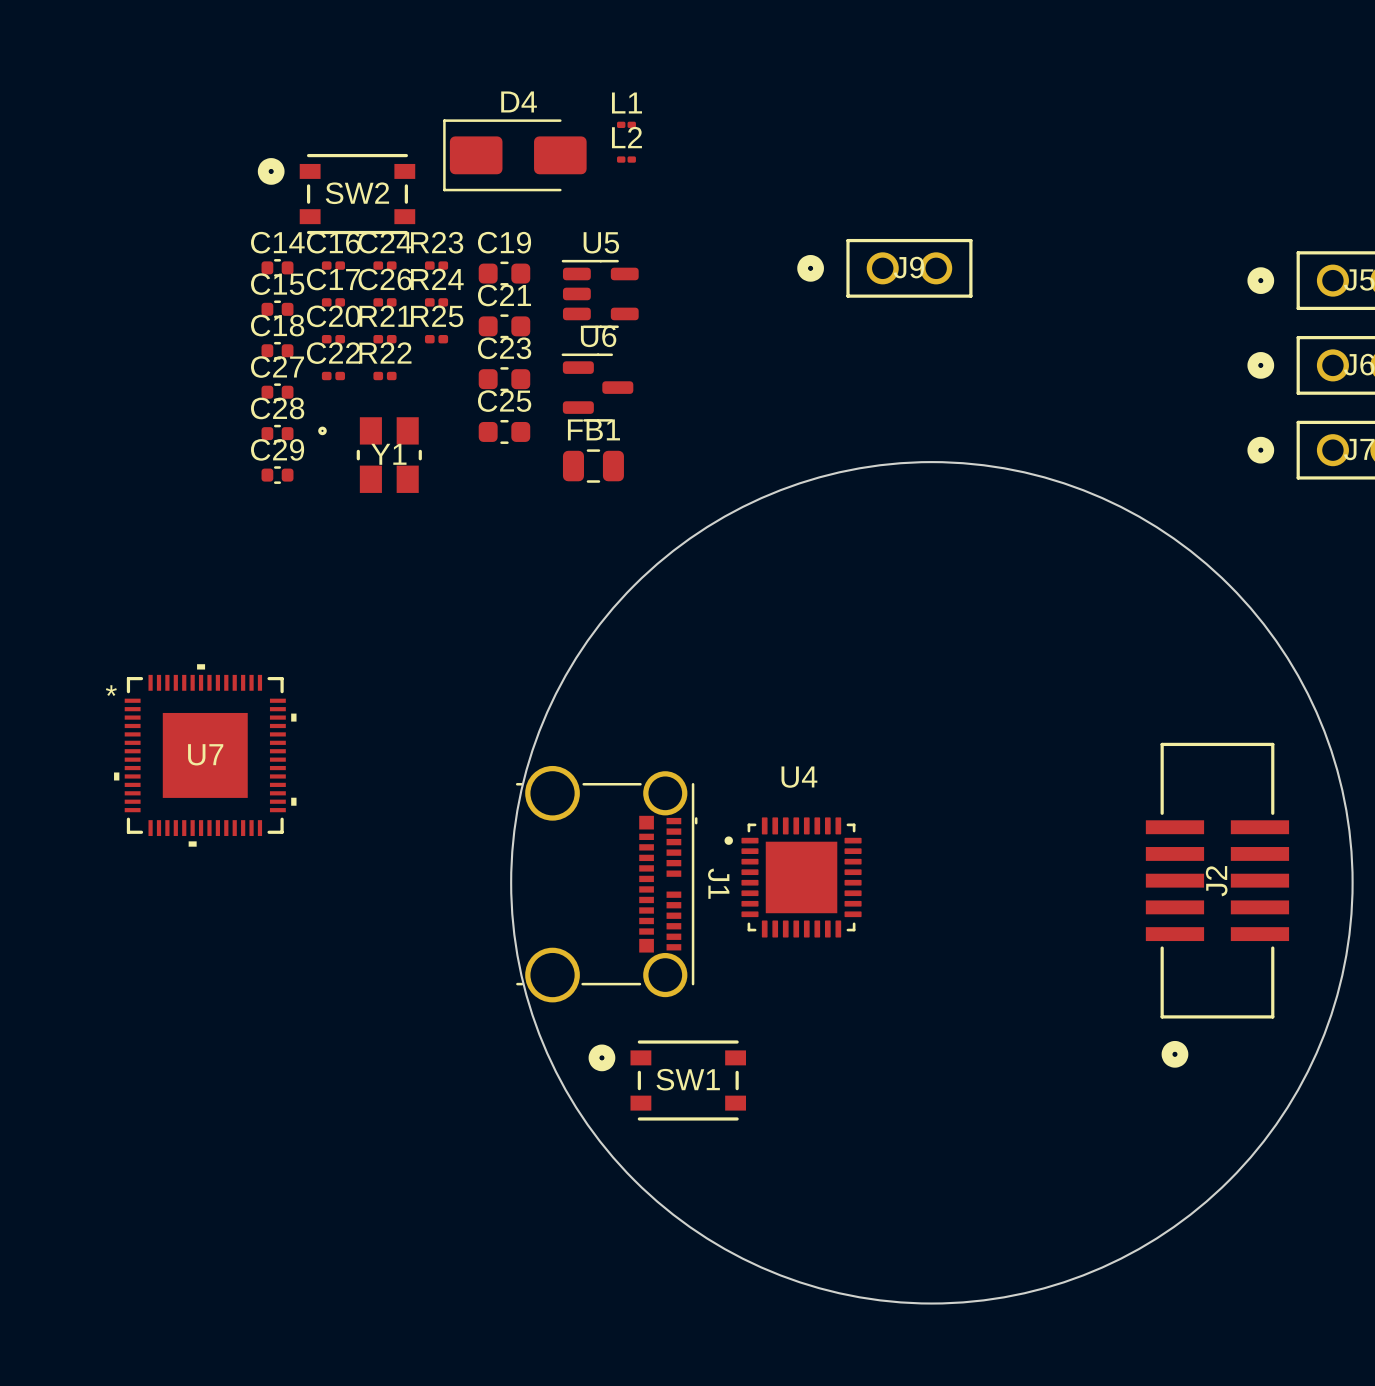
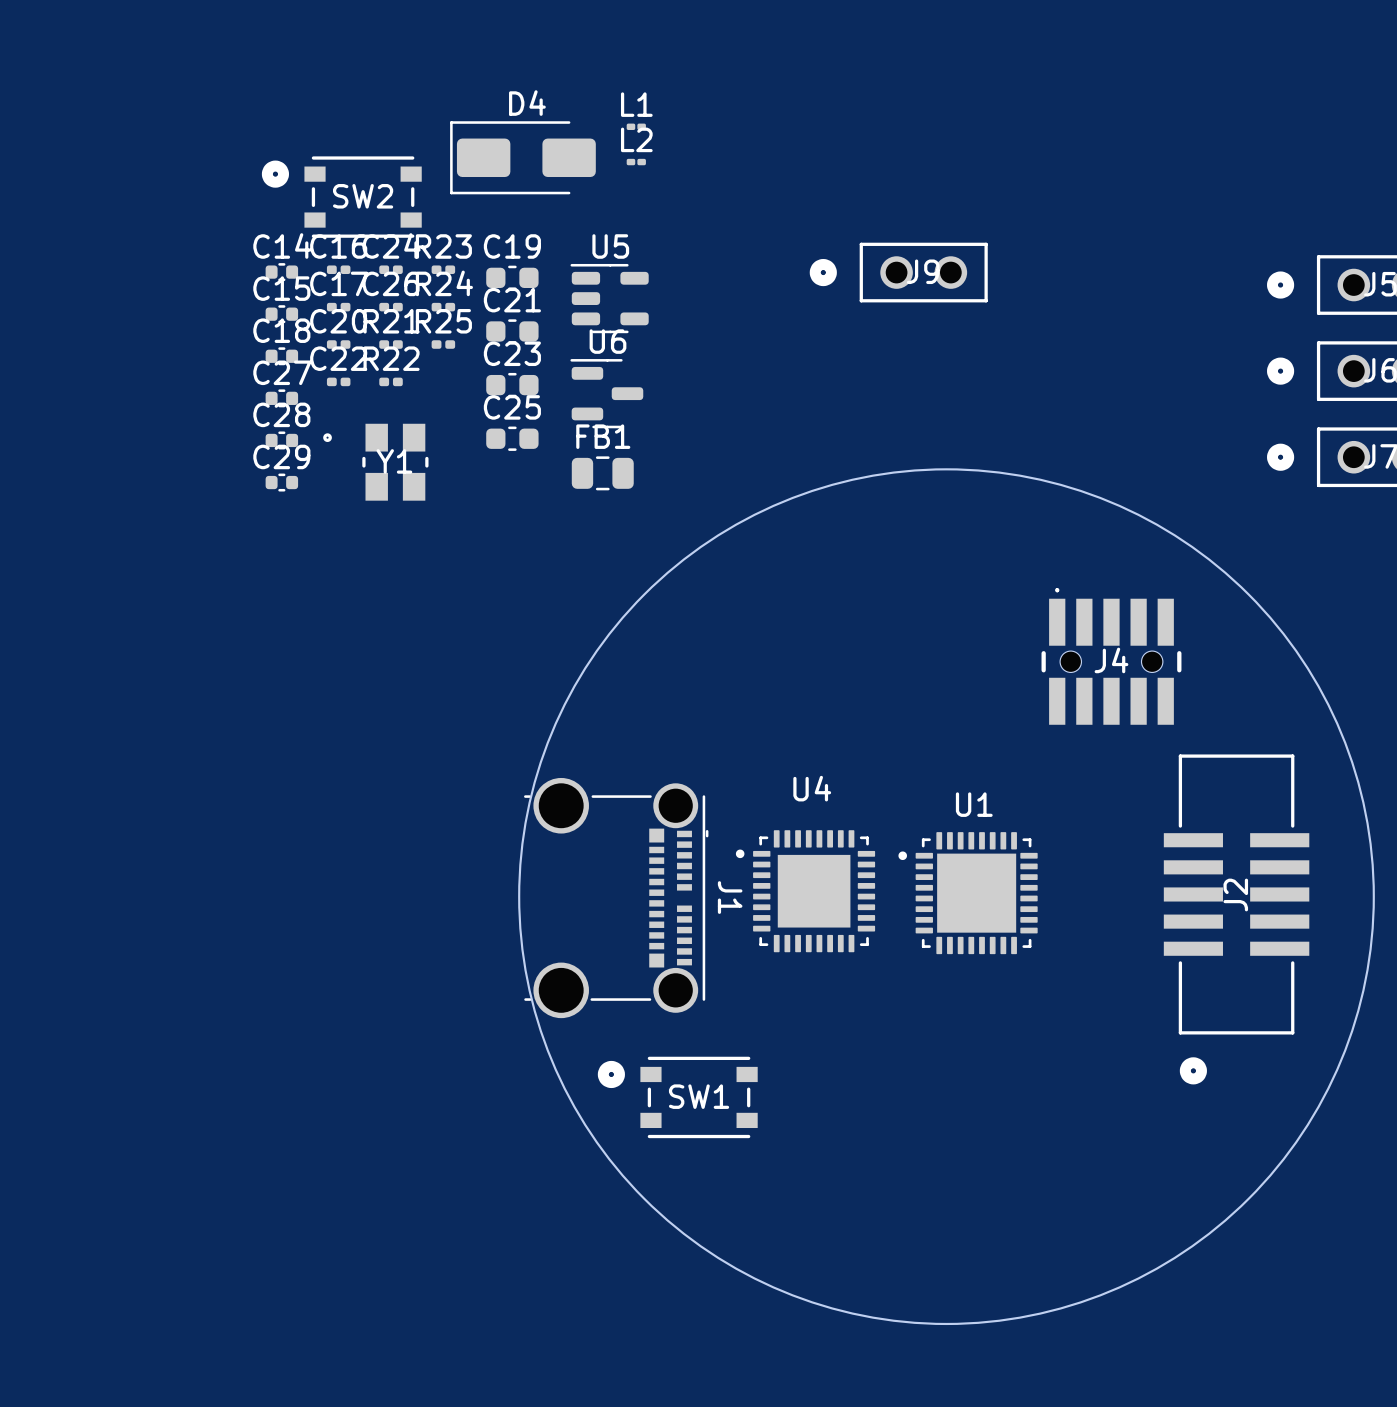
J4: none -> (1111, 656)
U7: (205, 755) -> none
U1: none -> (968, 893)

